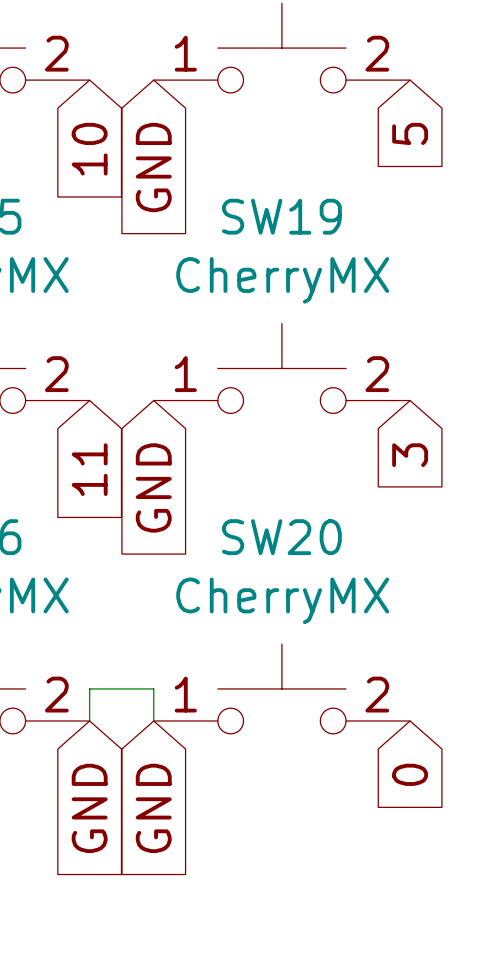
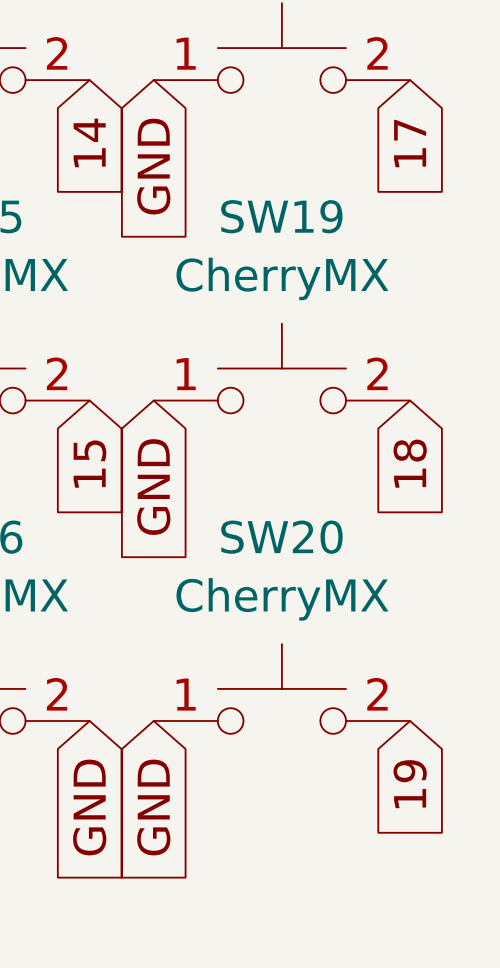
global label: 5 (410, 133) -> 17 (410, 143)
global label: 10 (89, 149) -> 14 (89, 142)
global label: 3 (410, 455) -> 18 (410, 463)
global label: 11 (89, 469) -> 15 (89, 464)
wire: (89, 720) (89, 688) (153, 688) (153, 720) -> none
global label: 0 (410, 774) -> 19 (410, 784)

